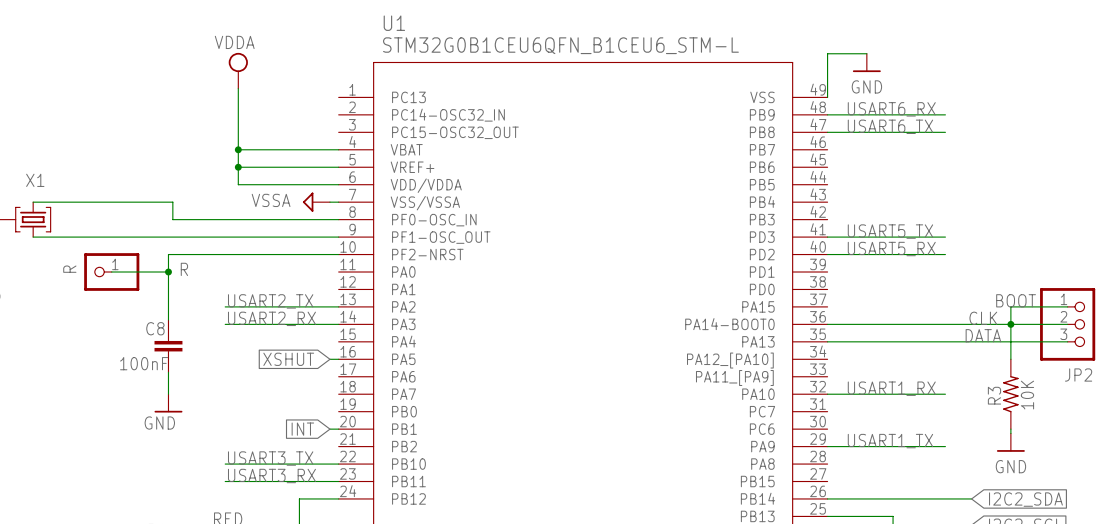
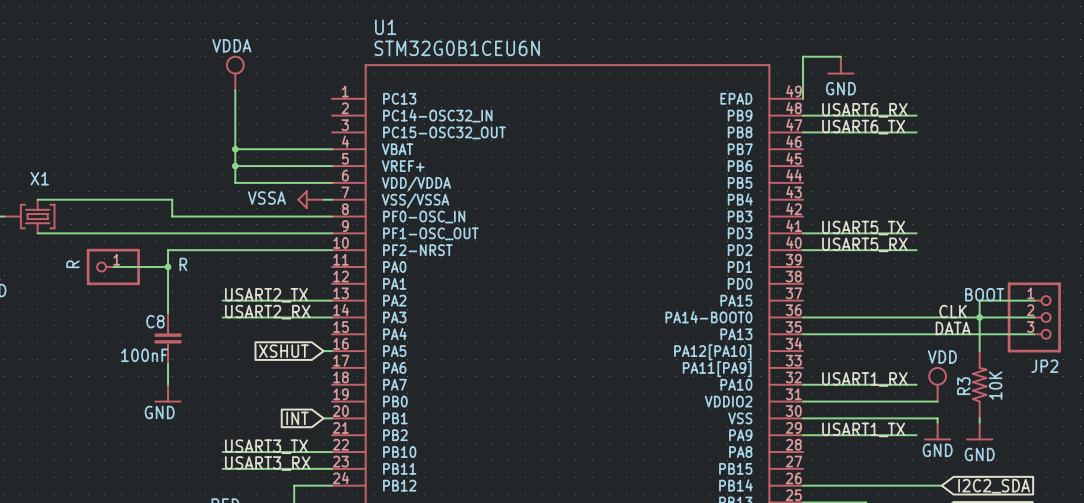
U1 value: STM32G0B1CEU6QFN_B1CEU6_STM-L (560, 45) -> STM32G0B1CEU6N (457, 48)
U1 pin name: VSS (762, 97) -> EPAD (736, 98)
U1 pin name: PA12_[PA10] (730, 360) -> PA12[PA10] (712, 352)
U1 pin name: PA11_[PA9] (734, 378) -> PA11[PA9] (717, 369)
power symbol: none -> VDD (937, 384)
U1 pin name: PC7 (762, 411) -> VDDIO2 (728, 401)
wire: none -> (803, 401) (937, 401)
U1 pin name: PC6 (762, 429) -> VSS (740, 418)
wire: none -> (803, 418) (937, 418) (937, 422)
power symbol: none -> GND (937, 431)

